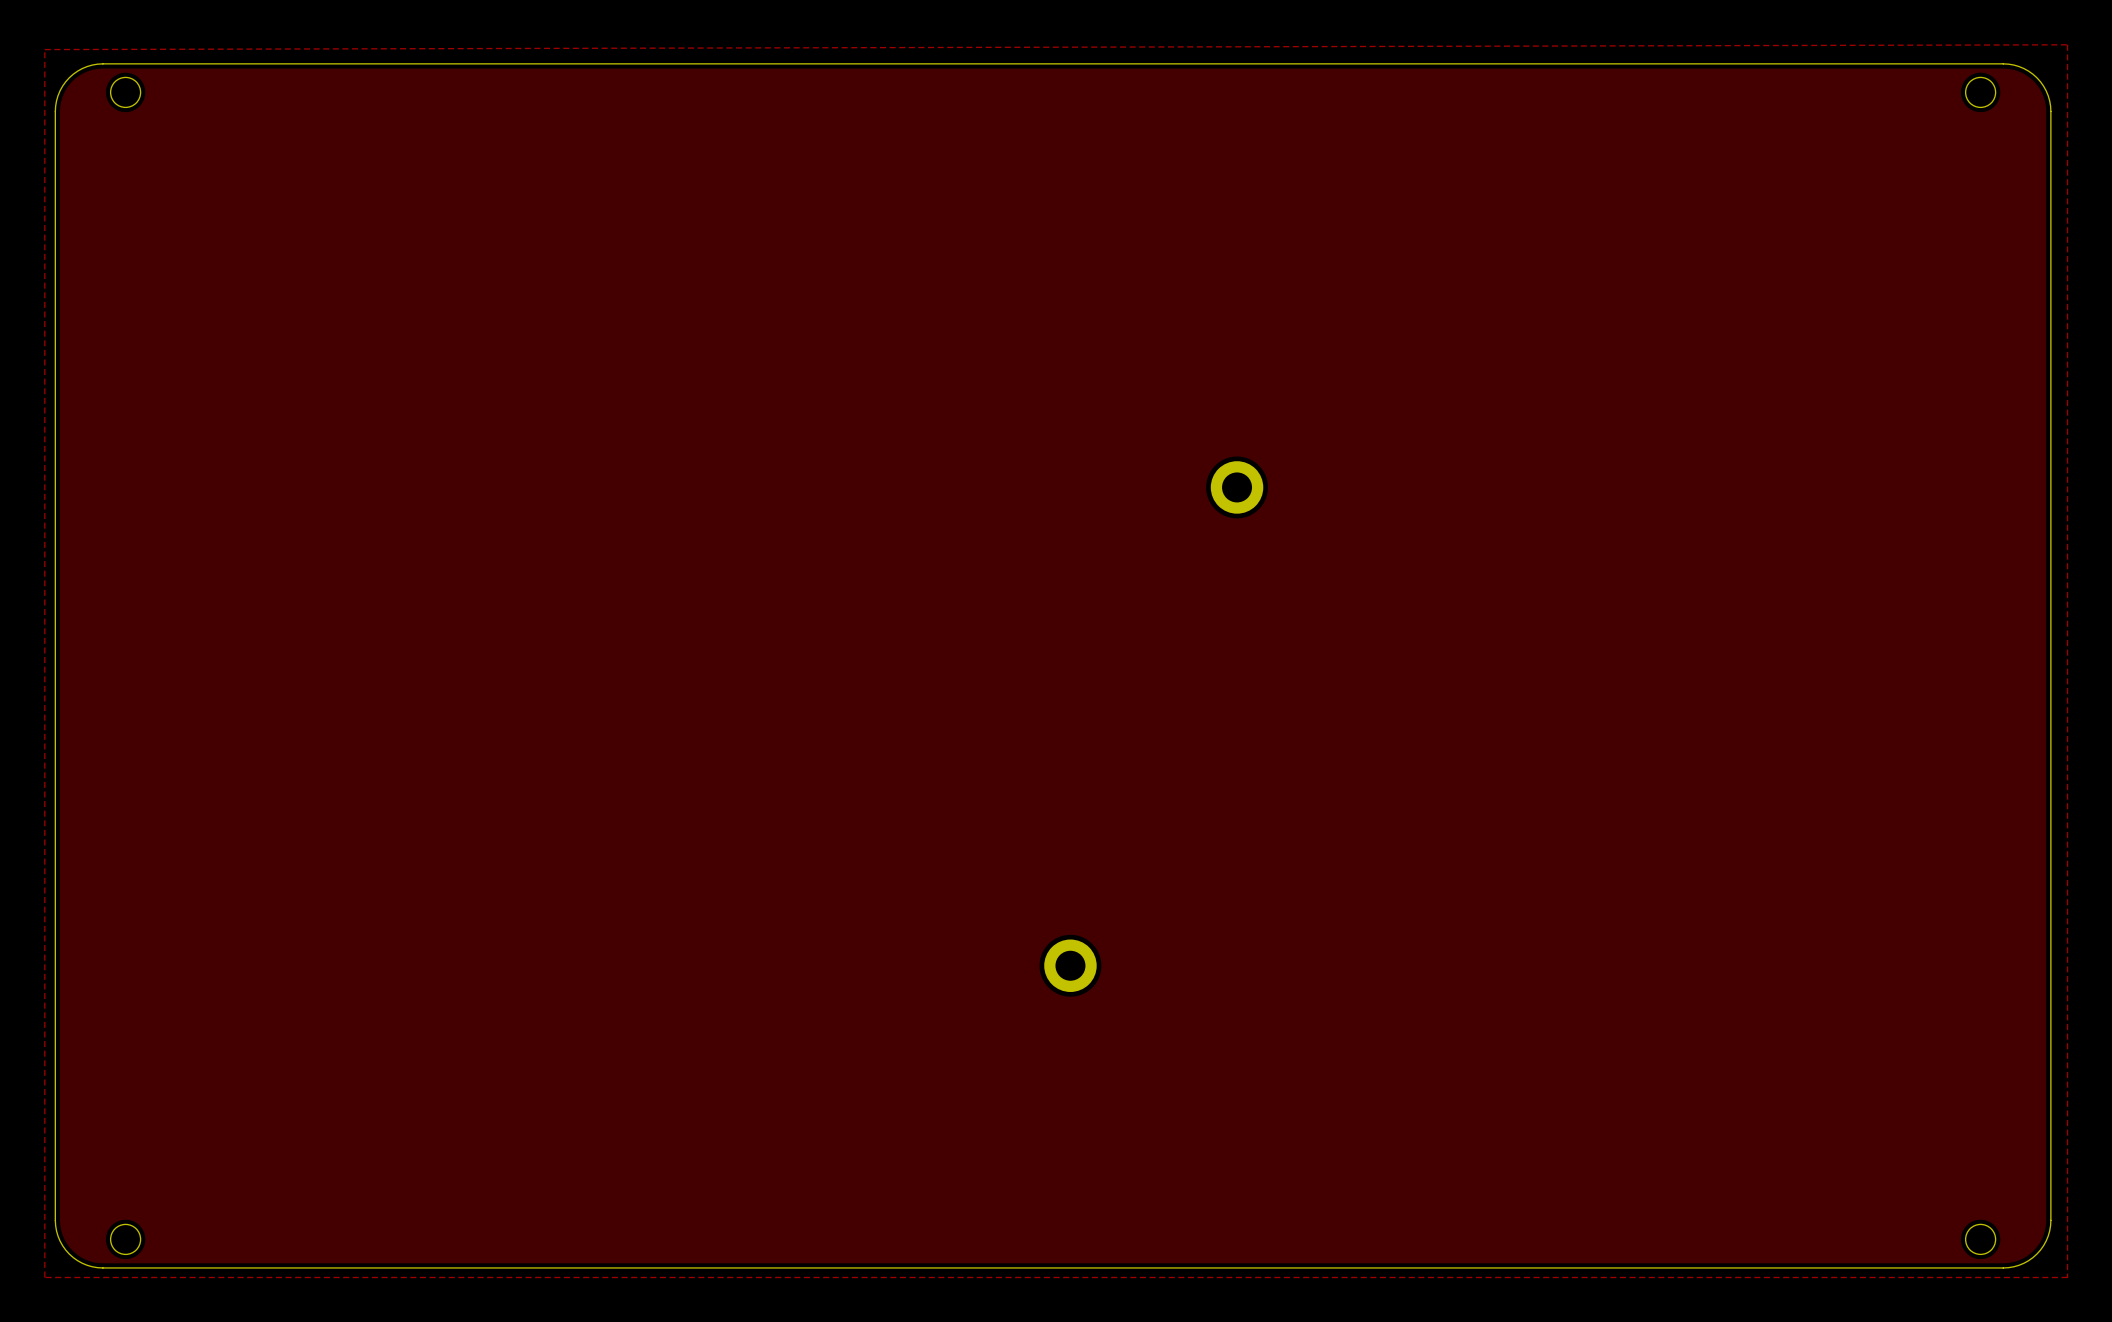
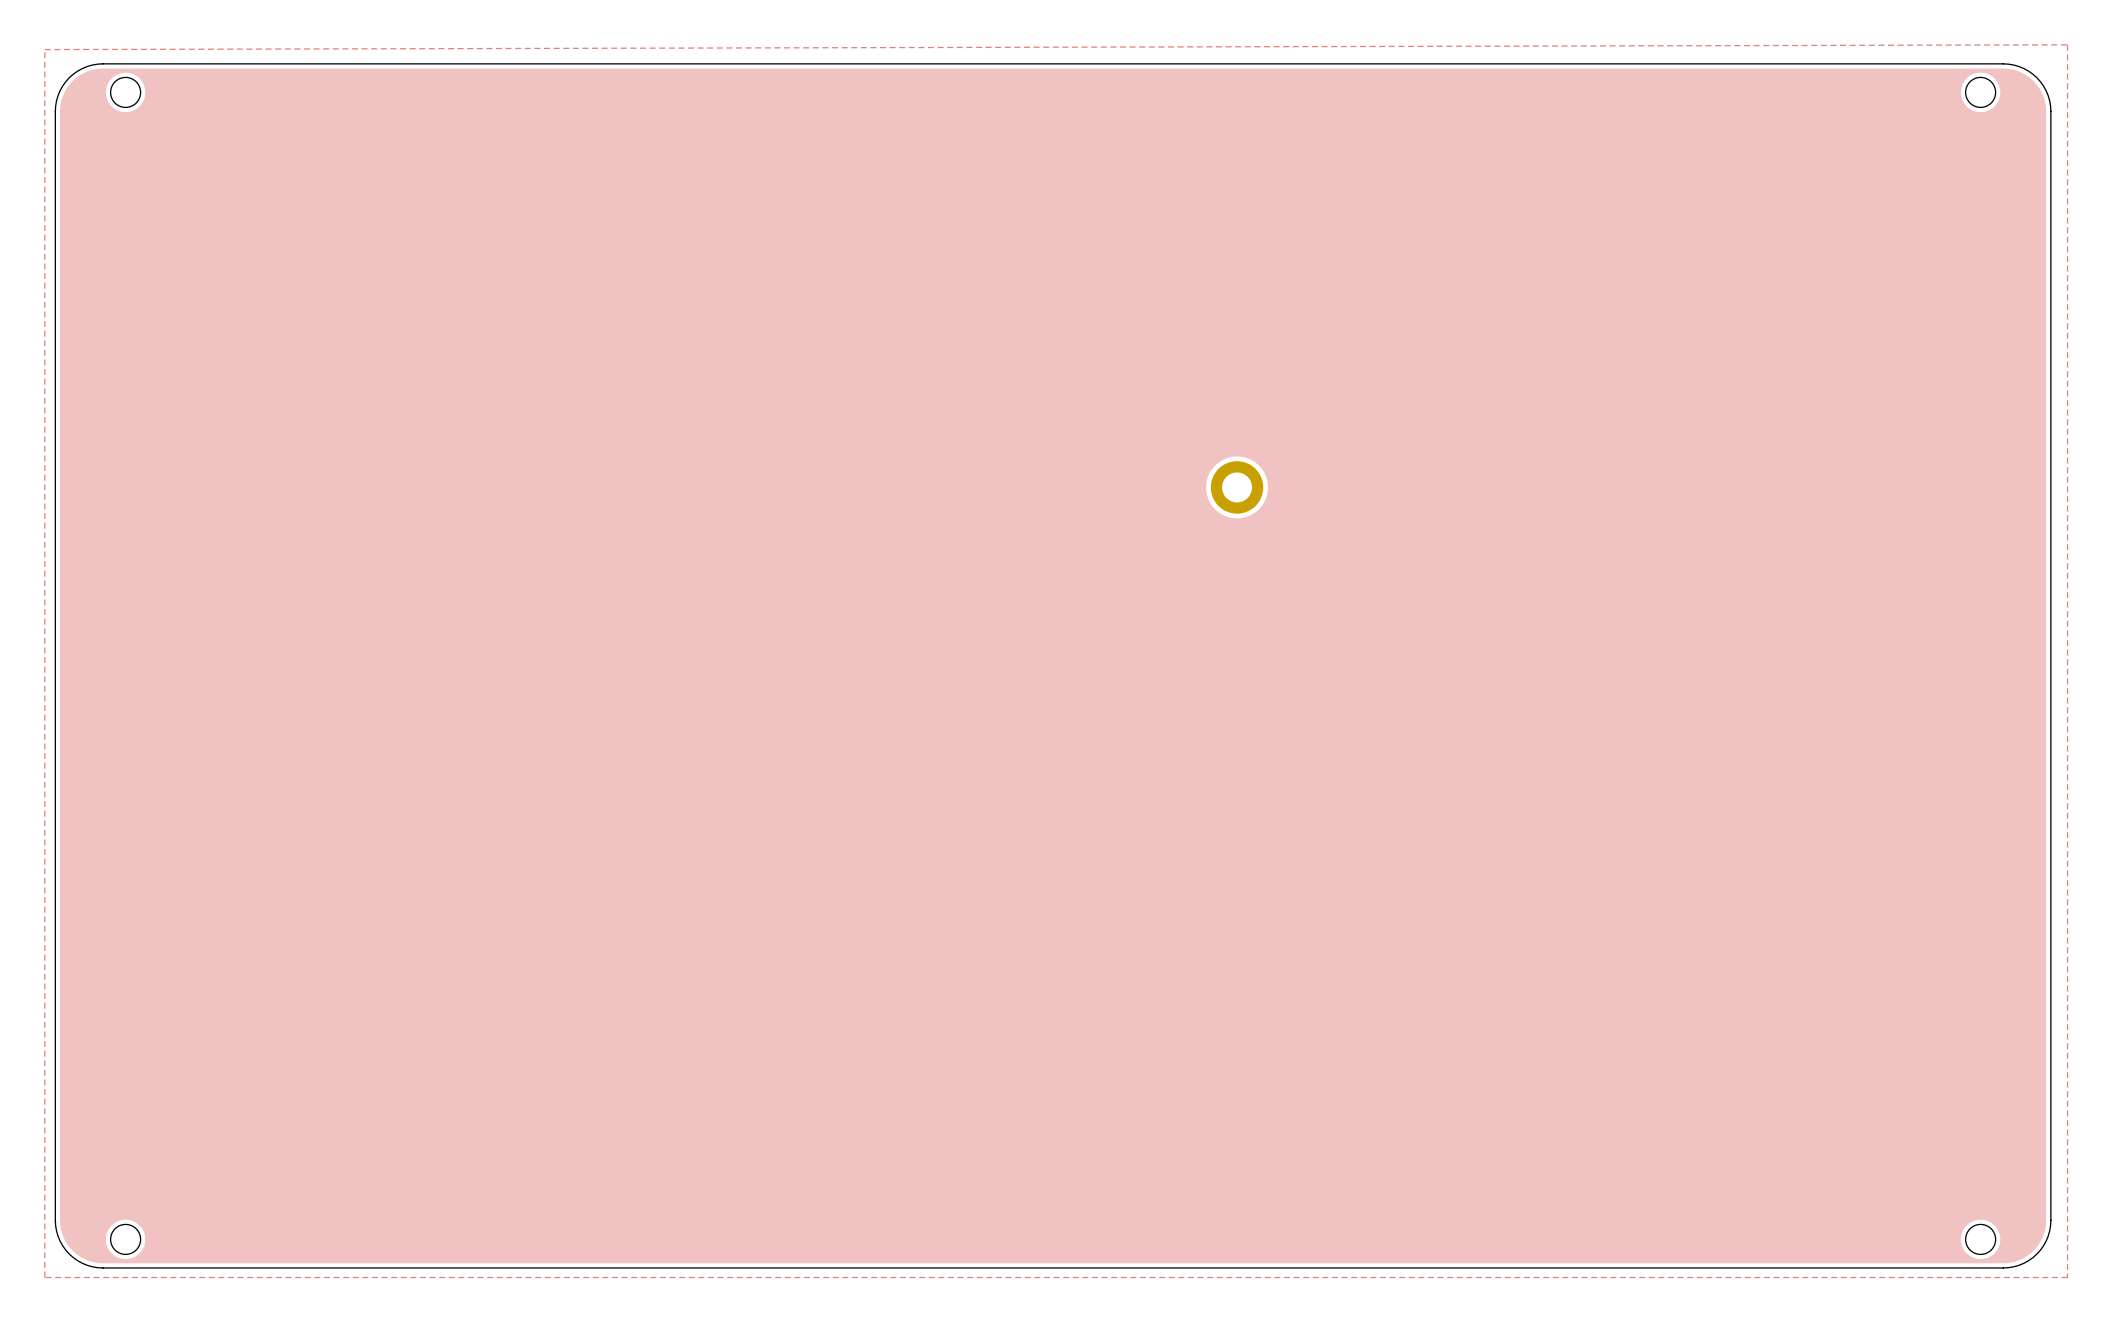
part: (1070, 965) -> none

